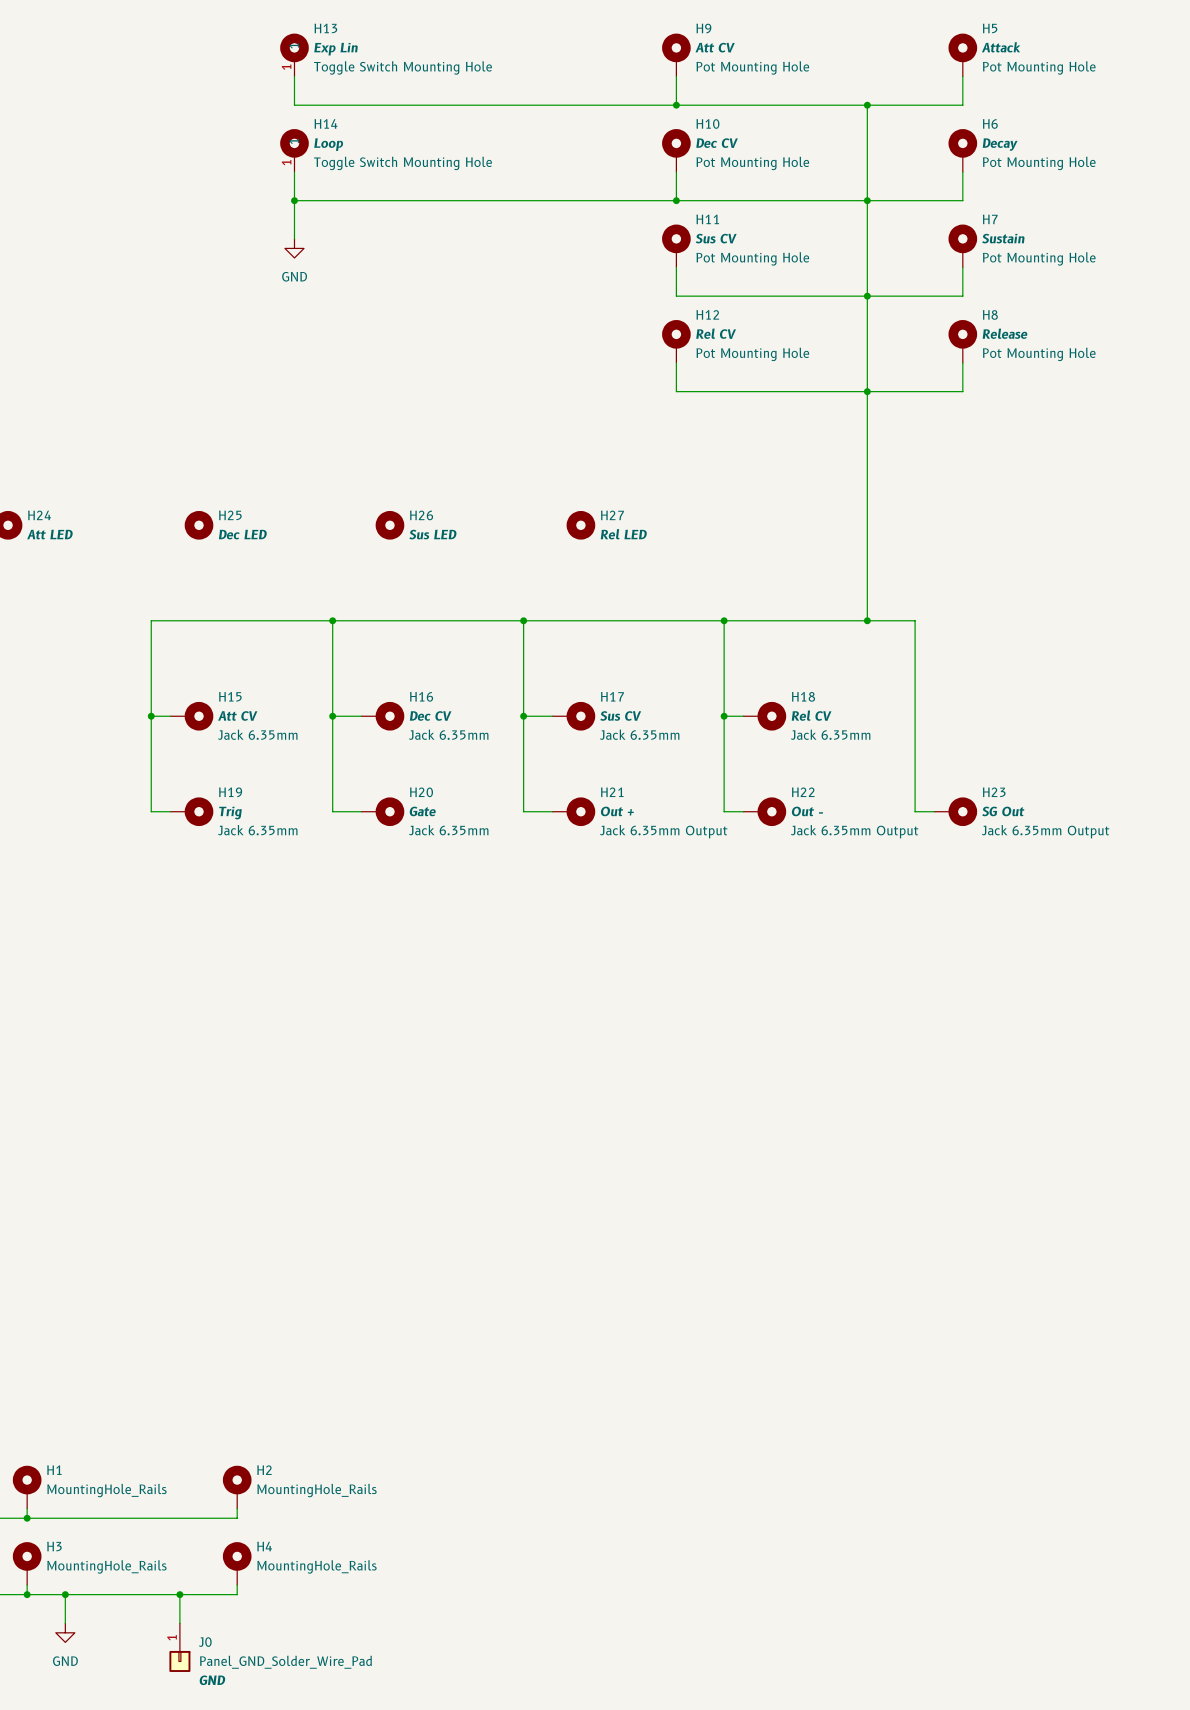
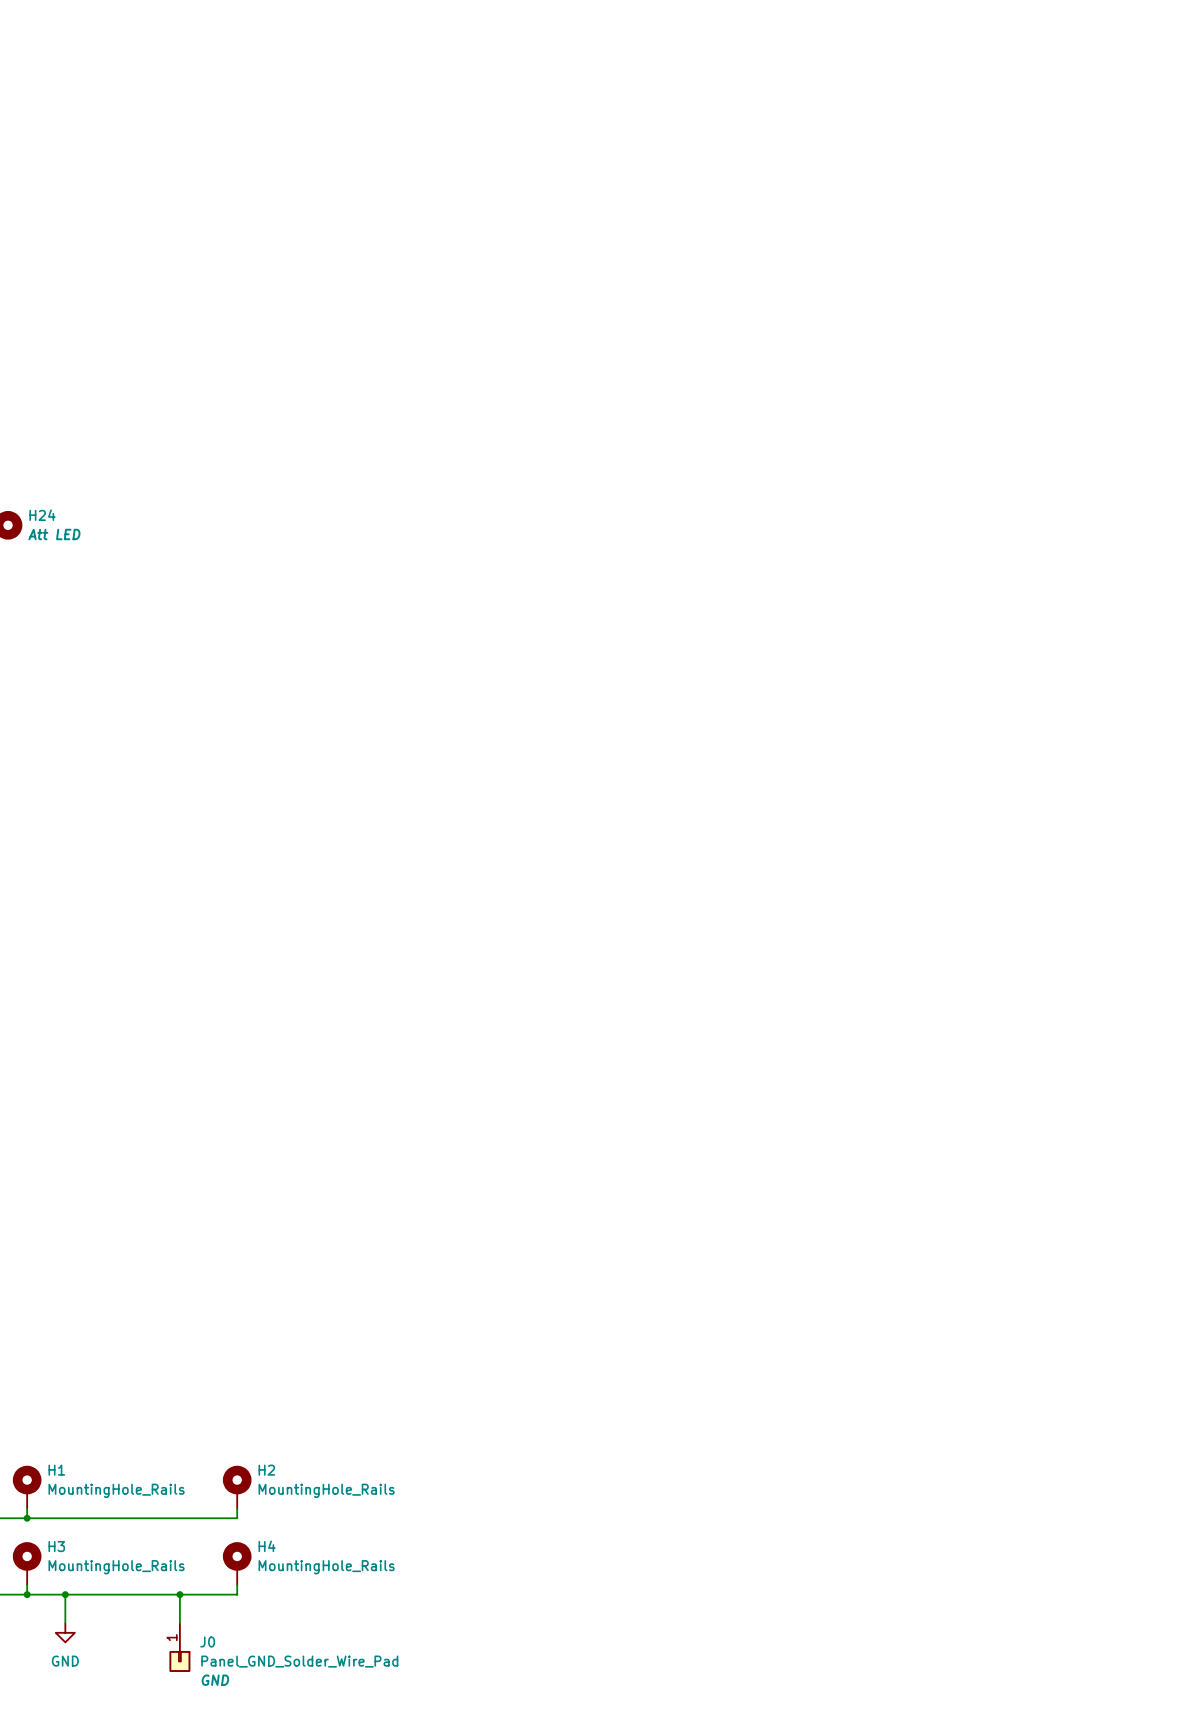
H13: Exp Lin (294, 55) -> none
H9: Att CV (676, 55) -> none
H5: Attack (962, 55) -> none
wire: (294, 76) (294, 105) (962, 105) (962, 76) -> none
wire: (676, 76) (676, 105) -> none
junction: (676, 105) -> none
wire: (867, 105) (867, 620) -> none
junction: (867, 105) -> none
H14: Loop (294, 150) -> none
H10: Dec CV (676, 150) -> none
H6: Decay (962, 150) -> none
wire: (294, 172) (294, 238) -> none
wire: (676, 172) (676, 200) -> none
wire: (962, 172) (962, 200) (294, 200) -> none
junction: (294, 200) -> none
junction: (676, 200) -> none
junction: (867, 200) -> none
H11: Sus CV (676, 246) -> none
H7: Sustain (962, 246) -> none
power symbol: GND (294, 248) -> none
wire: (676, 267) (676, 296) (962, 296) (962, 267) -> none
junction: (867, 296) -> none
H12: Rel CV (676, 341) -> none
H8: Release (962, 341) -> none
wire: (676, 362) (676, 391) (962, 391) (962, 362) -> none
junction: (867, 391) -> none
H25: Dec LED (199, 525) -> none
H26: Sus LED (389, 525) -> none
H27: Rel LED (580, 525) -> none
wire: (332, 620) (332, 811) (361, 811) -> none
junction: (332, 620) -> none
wire: (523, 620) (523, 811) (552, 811) -> none
junction: (523, 620) -> none
wire: (724, 620) (724, 811) (743, 811) -> none
junction: (724, 620) -> none
junction: (867, 620) -> none
wire: (151, 716) (170, 716) -> none
junction: (151, 716) -> none
H15: Att CV (191, 716) -> none
wire: (332, 716) (361, 716) -> none
junction: (332, 716) -> none
H16: Dec CV (382, 716) -> none
wire: (523, 716) (552, 716) -> none
junction: (523, 716) -> none
H17: Sus CV (573, 716) -> none
wire: (724, 716) (743, 716) -> none
junction: (724, 716) -> none
H18: Rel CV (764, 716) -> none
wire: (170, 811) (151, 811) (151, 620) (915, 620) (915, 811) (934, 811) -> none
H19: Trig (191, 811) -> none
H20: Gate (382, 811) -> none
H21: Out + (573, 811) -> none
H22: Out - (764, 811) -> none
H23: SG Out (955, 811) -> none

